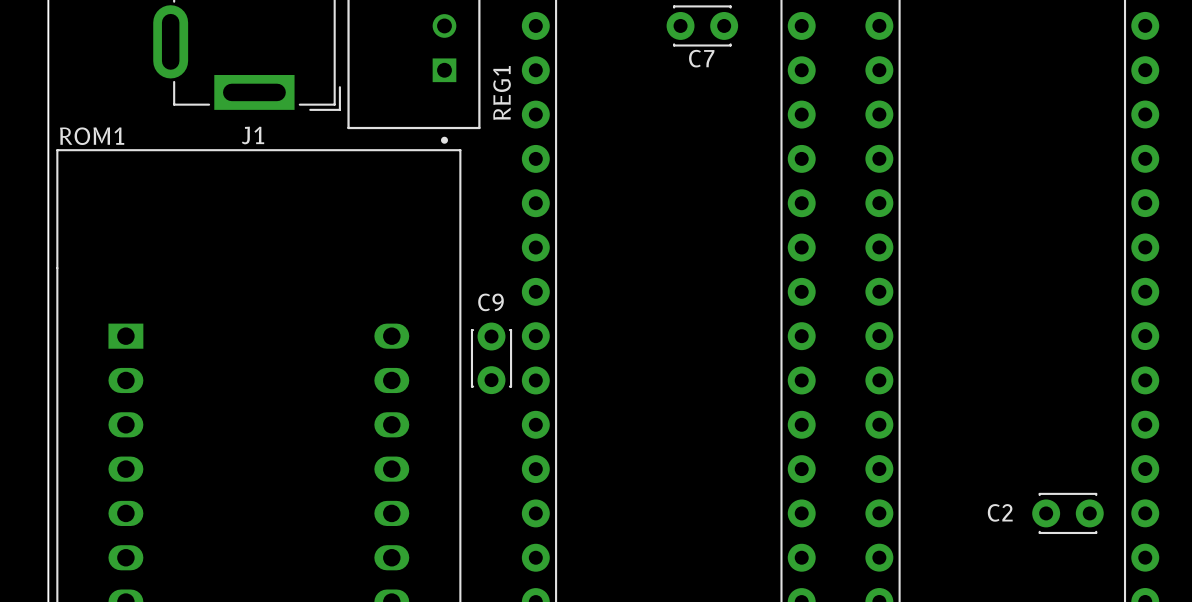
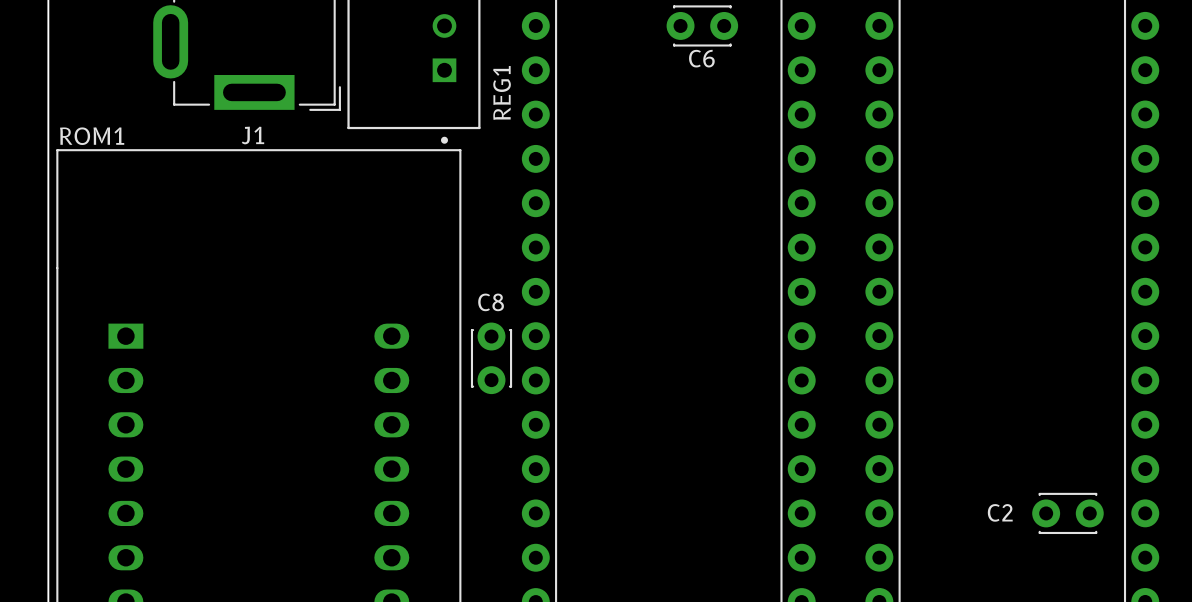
C7 name: C7 (701, 58) -> C6 (701, 58)
C9 name: C9 (491, 302) -> C8 (491, 302)

